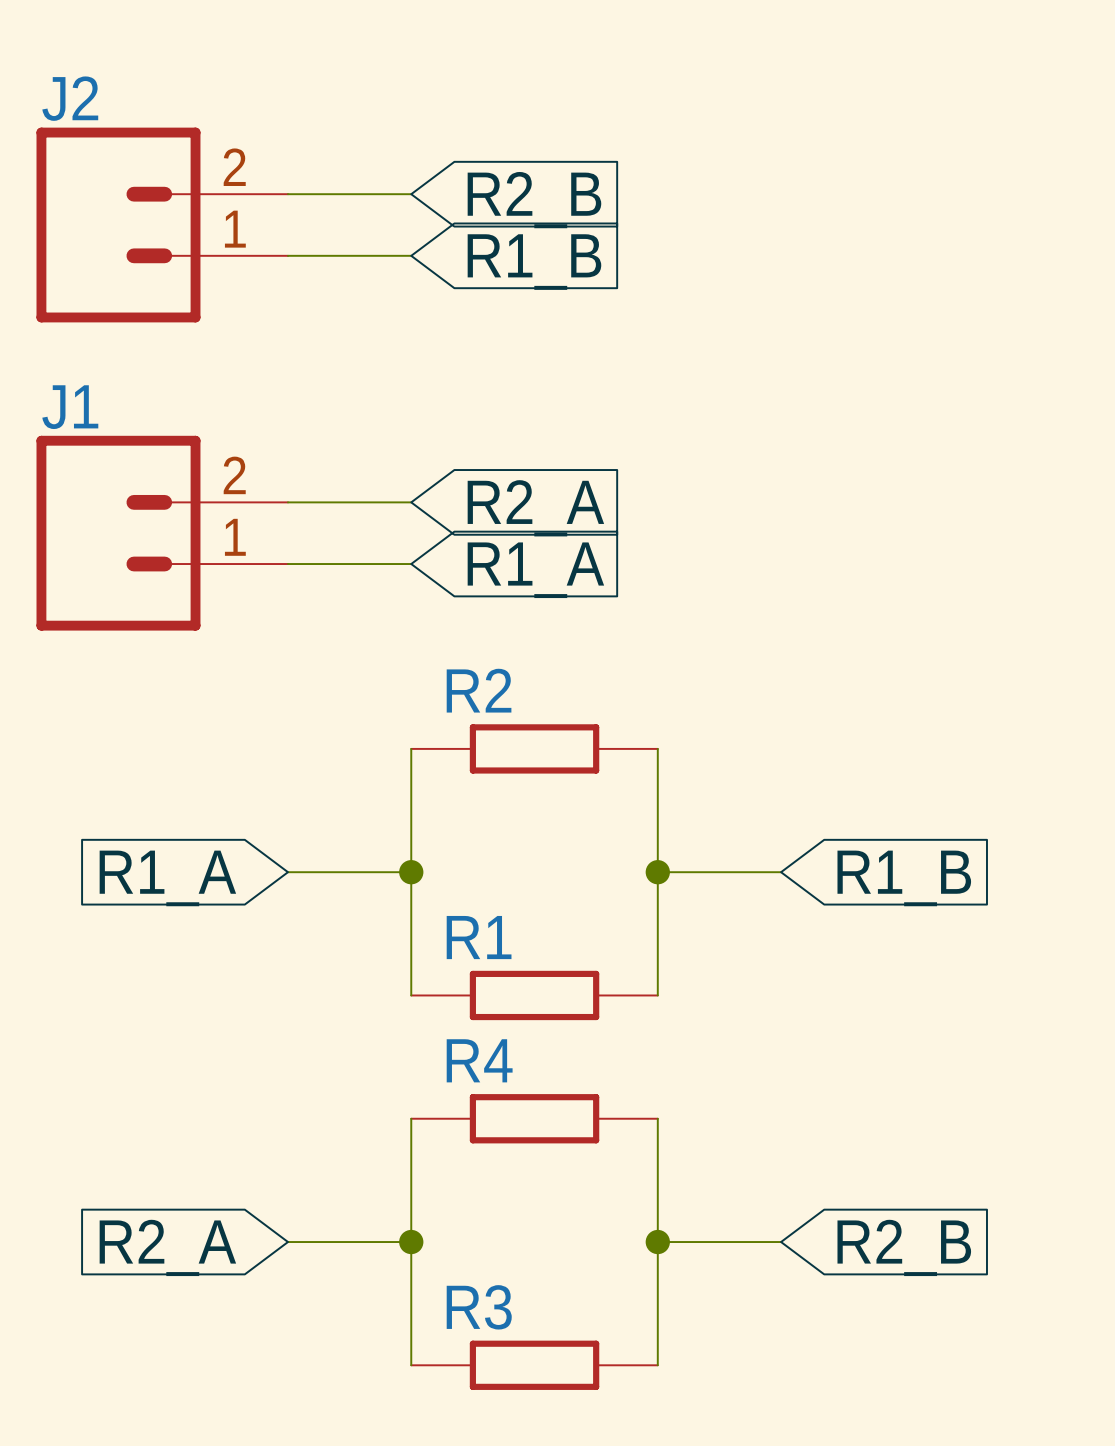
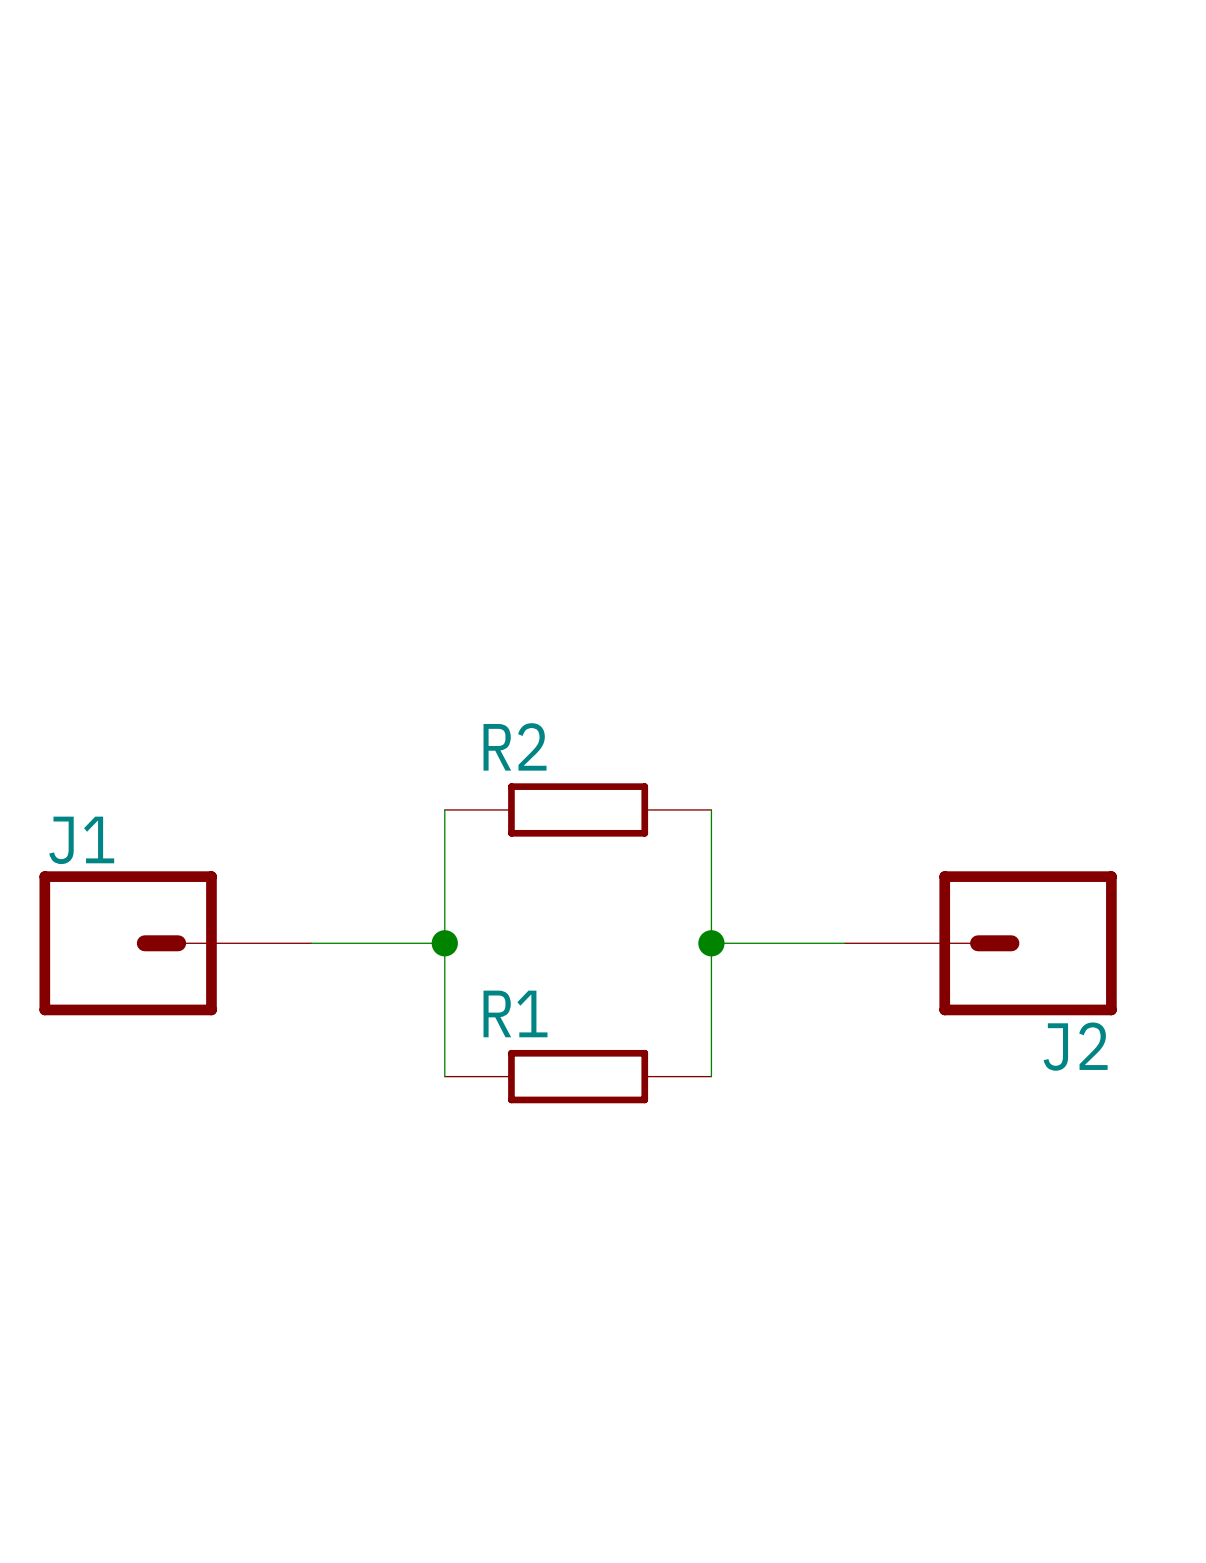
J2 name position: J2 (70, 98) -> J2 (1075, 1046)
J2 symbol: [36, 127, 288, 323] -> [844, 871, 1117, 1016]
wire: (287, 194) (411, 194) -> none
global label: R2_B (534, 200) -> none
wire: (287, 255) (411, 255) -> none
global label: R1_B (534, 262) -> none
J1 symbol: [36, 435, 288, 631] -> [39, 871, 312, 1016]
wire: (287, 502) (411, 502) -> none
global label: R2_A (535, 508) -> none
wire: (287, 564) (411, 564) -> none
global label: R1_A (535, 570) -> none
global label: R1_A (167, 878) -> none
global label: R1_B (904, 878) -> none
wire: (411, 1118) (411, 1365) -> none
R4: (534, 1118) -> none
wire: (657, 1118) (657, 1365) -> none
wire: (287, 1242) (411, 1242) -> none
junction: (411, 1242) -> none
wire: (657, 1242) (781, 1242) -> none
junction: (657, 1242) -> none
global label: R2_A (167, 1247) -> none
global label: R2_B (904, 1247) -> none
R3: (534, 1365) -> none

